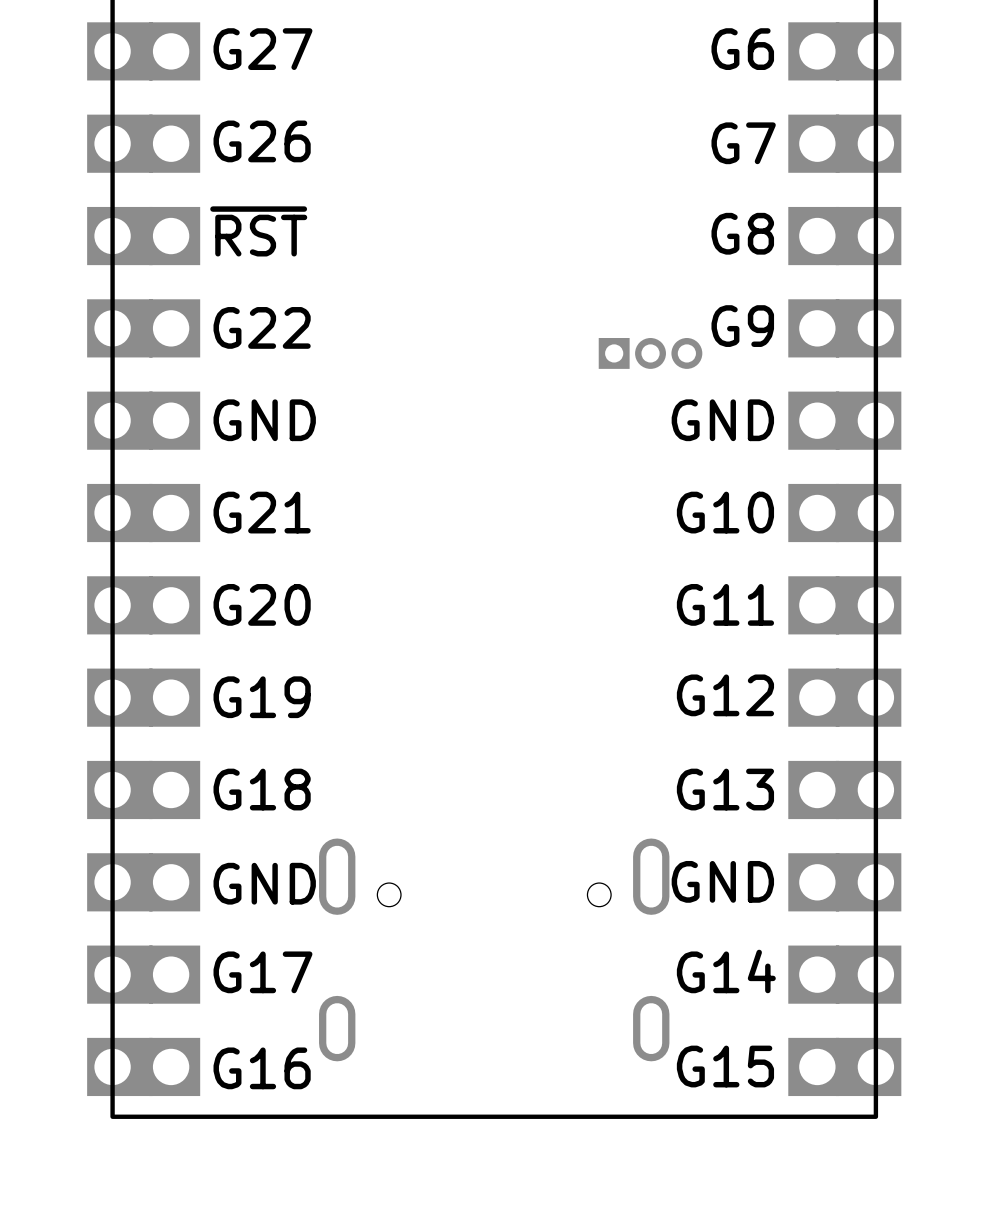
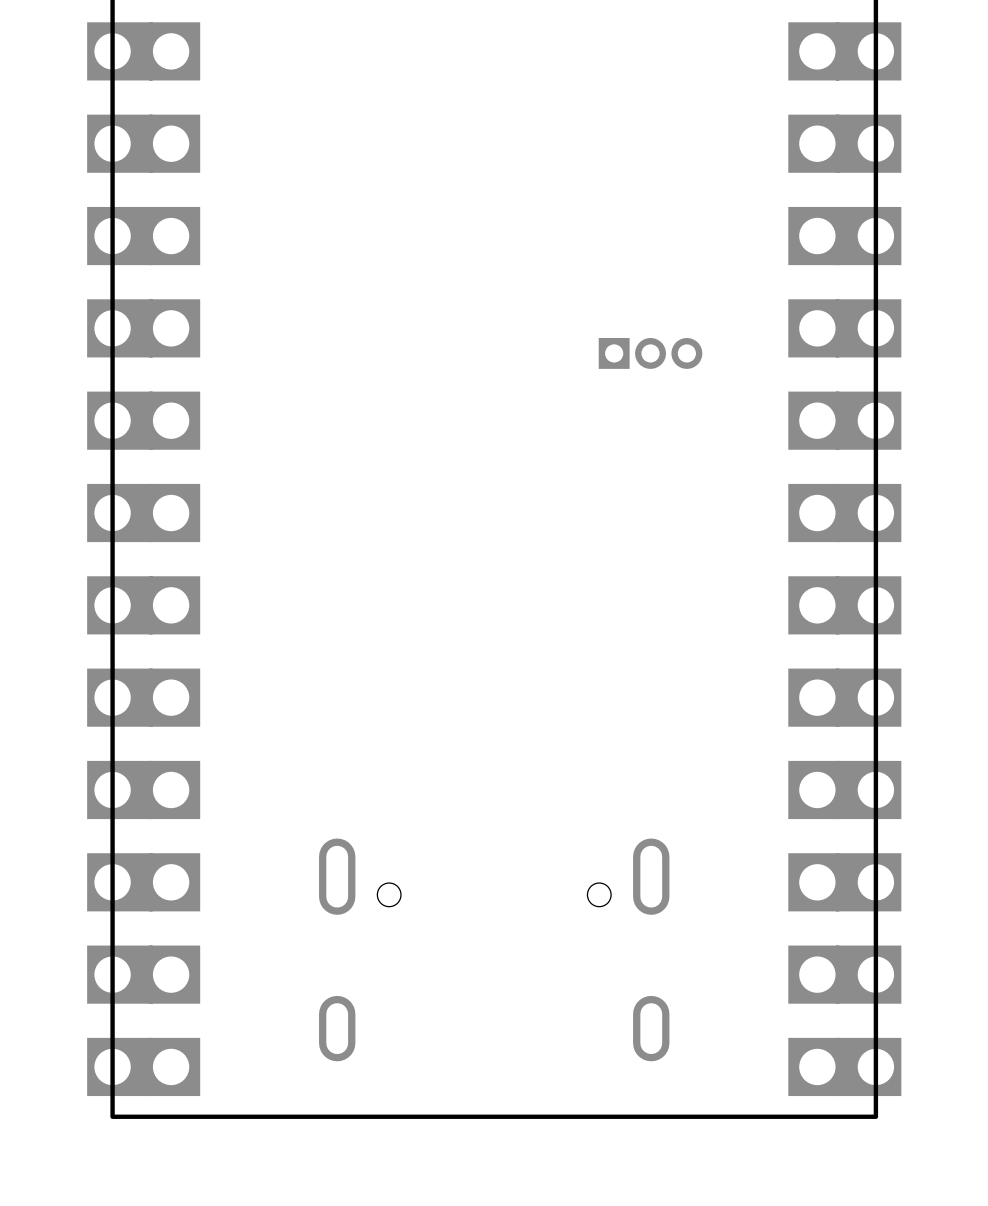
text: G27 (262, 49) -> none
text: G6 (742, 49) -> none
text: G26 (262, 141) -> none
text: G7 (743, 143) -> none
text: ~{RST} (258, 231) -> none
text: G8 (742, 233) -> none
text: G9 (742, 326) -> none
text: G22 (262, 327) -> none
text: GND (264, 420) -> none
text: GND (722, 420) -> none
text: G21 (262, 512) -> none
text: G10 (725, 512) -> none
text: G20 (262, 604) -> none
text: G11 (725, 604) -> none
text: G12 (725, 695) -> none
text: G19 (262, 697) -> none
text: G18 (262, 789) -> none
text: G13 (725, 789) -> none
text: GND (722, 881) -> none
text: GND (264, 883) -> none
text: G14 (726, 971) -> none
text: G17 (262, 972) -> none
text: G15 (725, 1066) -> none
text: G16 (262, 1068) -> none

